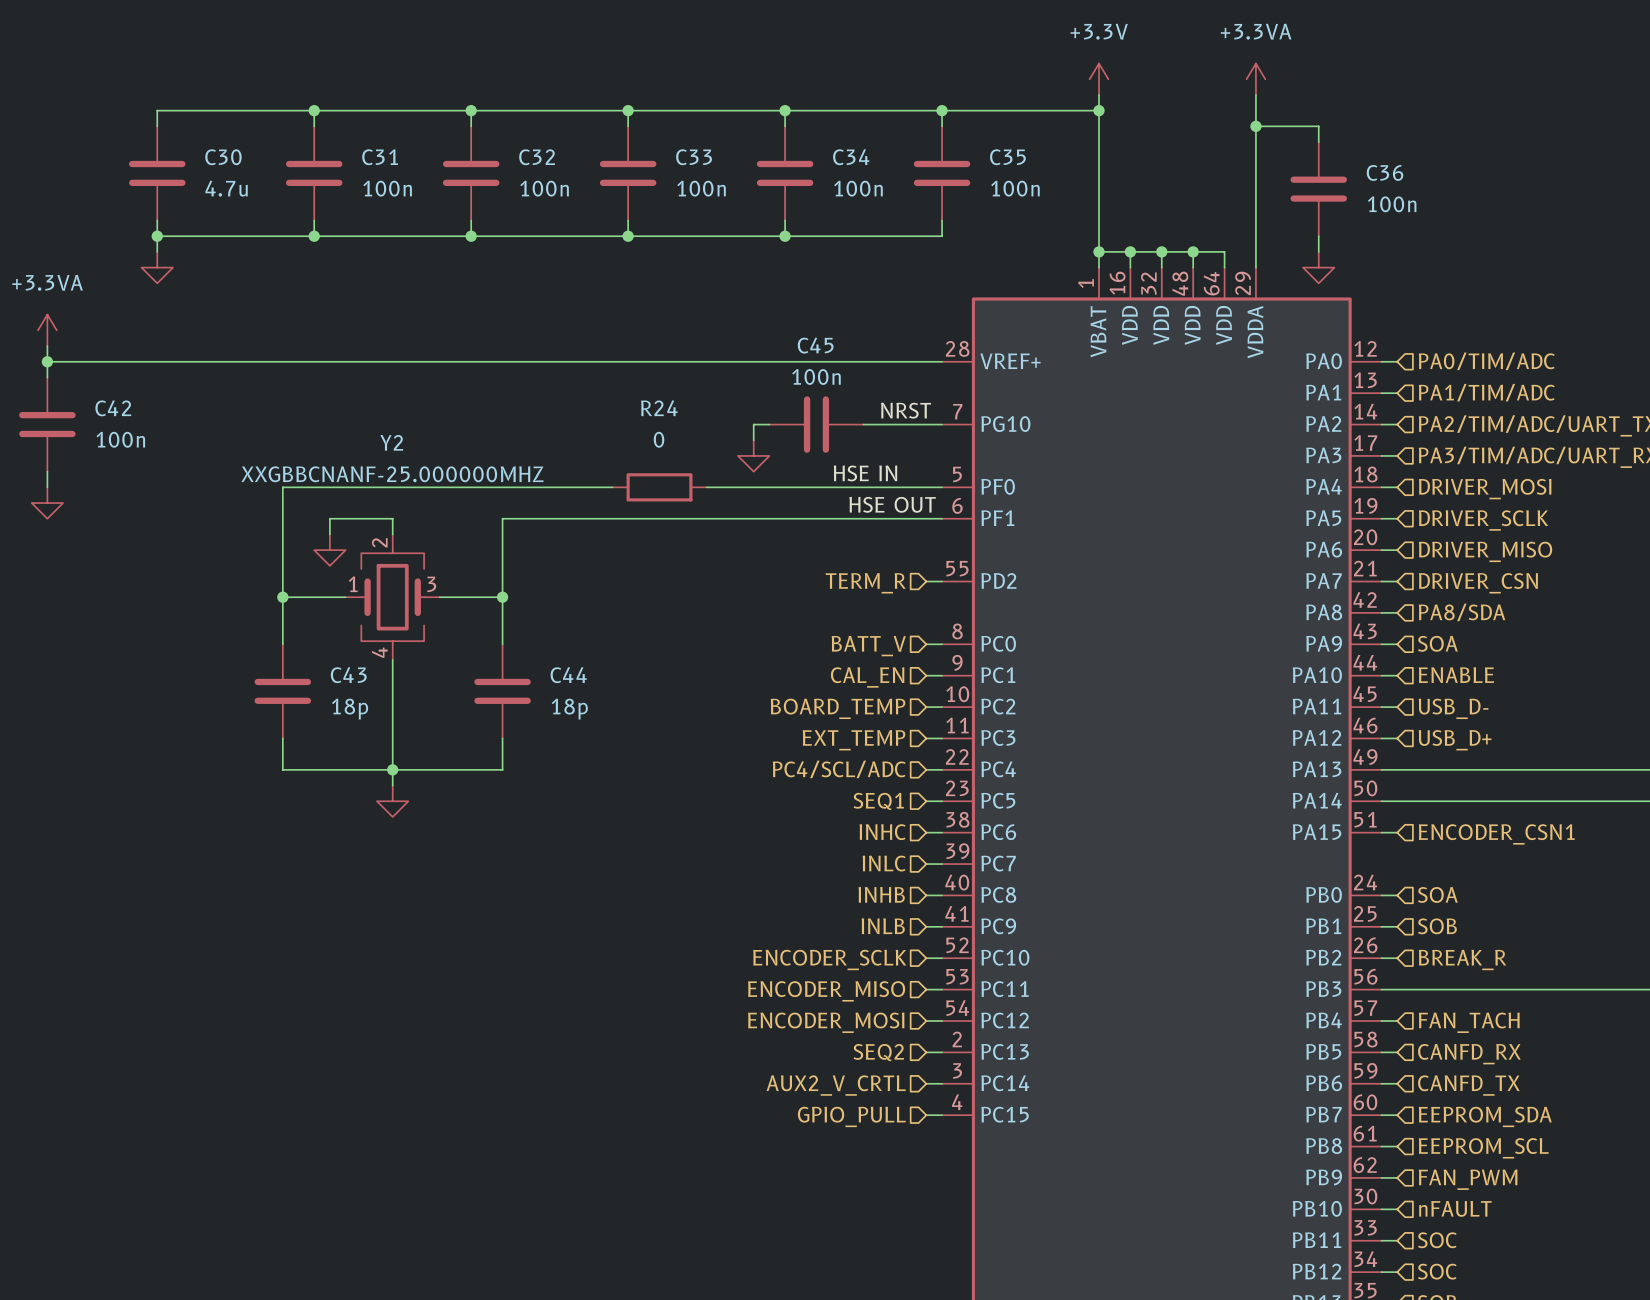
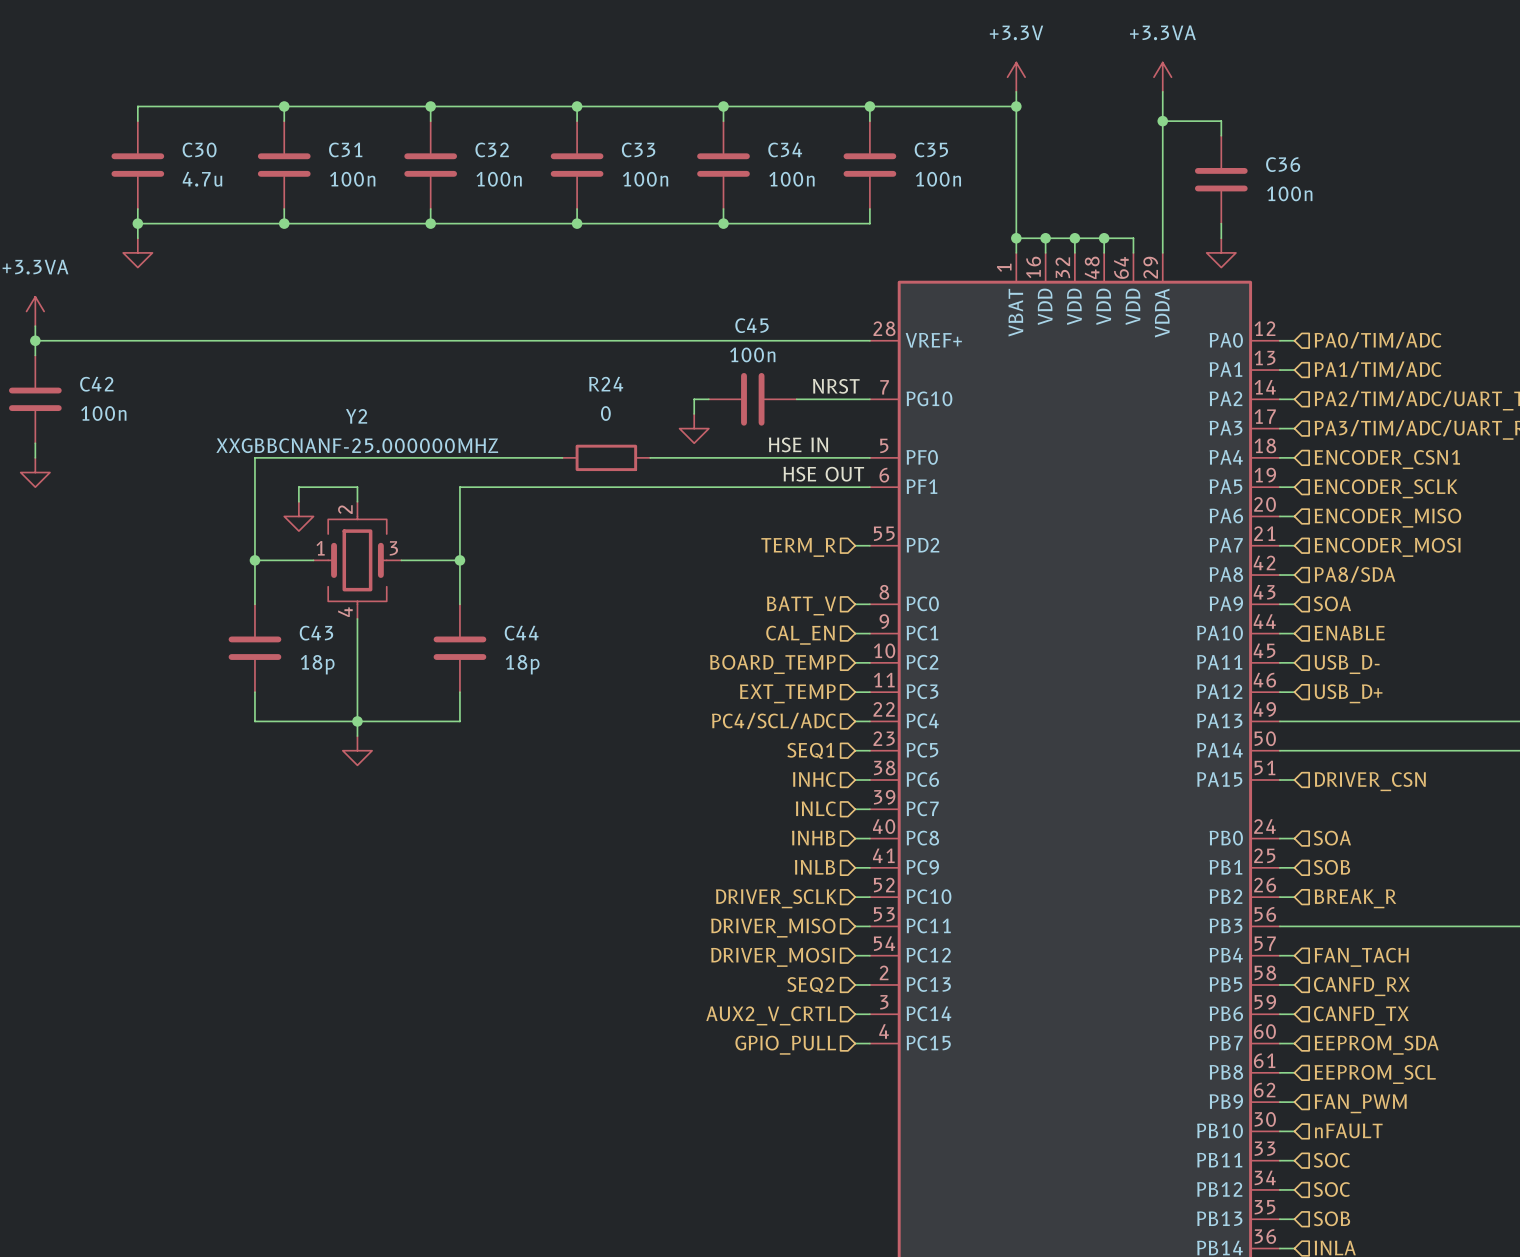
hierarchical label: DRIVER_MOSI (1485, 489) -> ENCODER_CSN1 (1387, 459)
hierarchical label: DRIVER_SCLK (1483, 520) -> ENCODER_SCLK (1386, 488)
hierarchical label: DRIVER_MISO (1485, 551) -> ENCODER_MISO (1387, 518)
hierarchical label: DRIVER_CSN (1478, 583) -> ENCODER_MOSI (1387, 547)
hierarchical label: ENCODER_CSN1 (1496, 834) -> DRIVER_CSN (1370, 781)
hierarchical label: ENCODER_SCLK (829, 959) -> DRIVER_SCLK (776, 898)
hierarchical label: ENCODER_MISO (826, 991) -> DRIVER_MISO (773, 928)
hierarchical label: ENCODER_MOSI (826, 1022) -> DRIVER_MOSI (772, 957)

